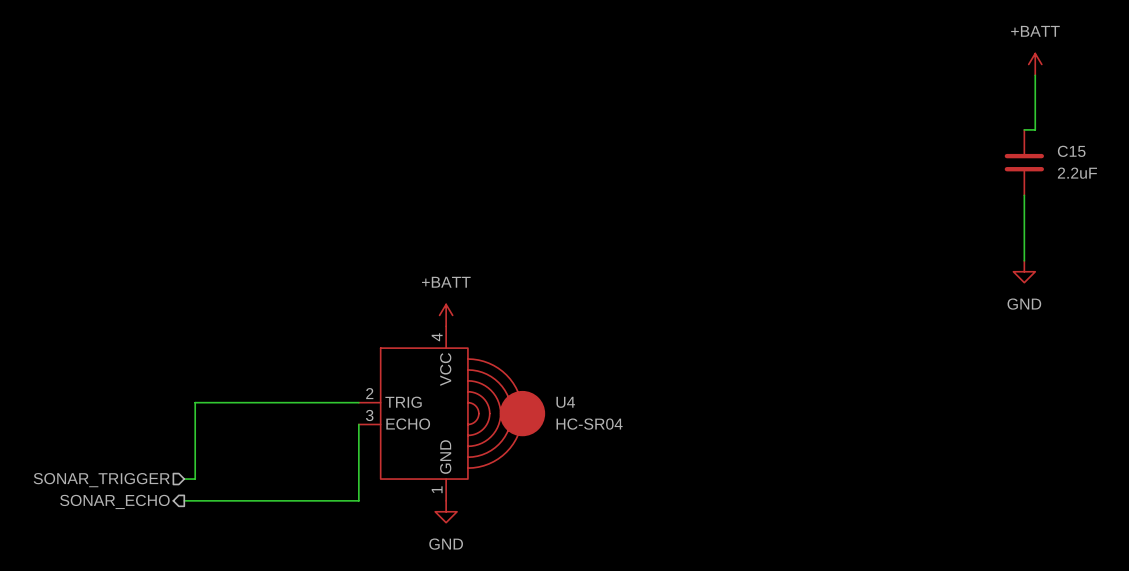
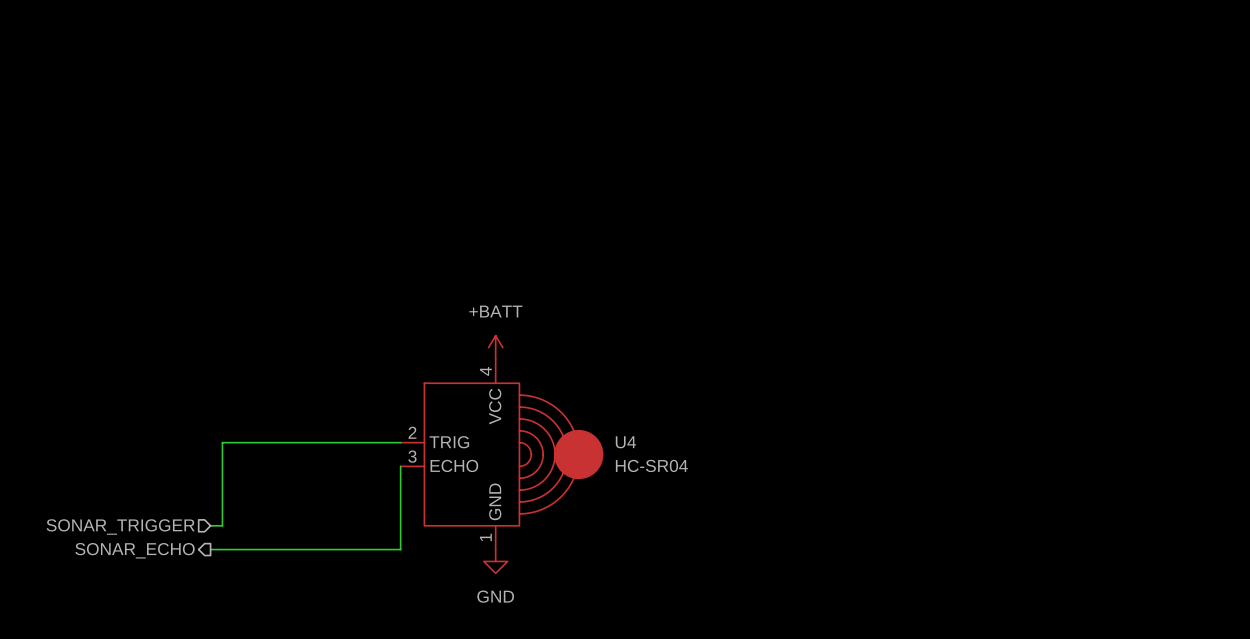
power symbol: +BATT (1035, 64) -> none
wire: (1035, 75) (1035, 129) (1024, 129) -> none
C15: 2.2uF (1024, 162) -> none
wire: (1024, 195) (1024, 260) -> none
power symbol: GND (1024, 271) -> none

